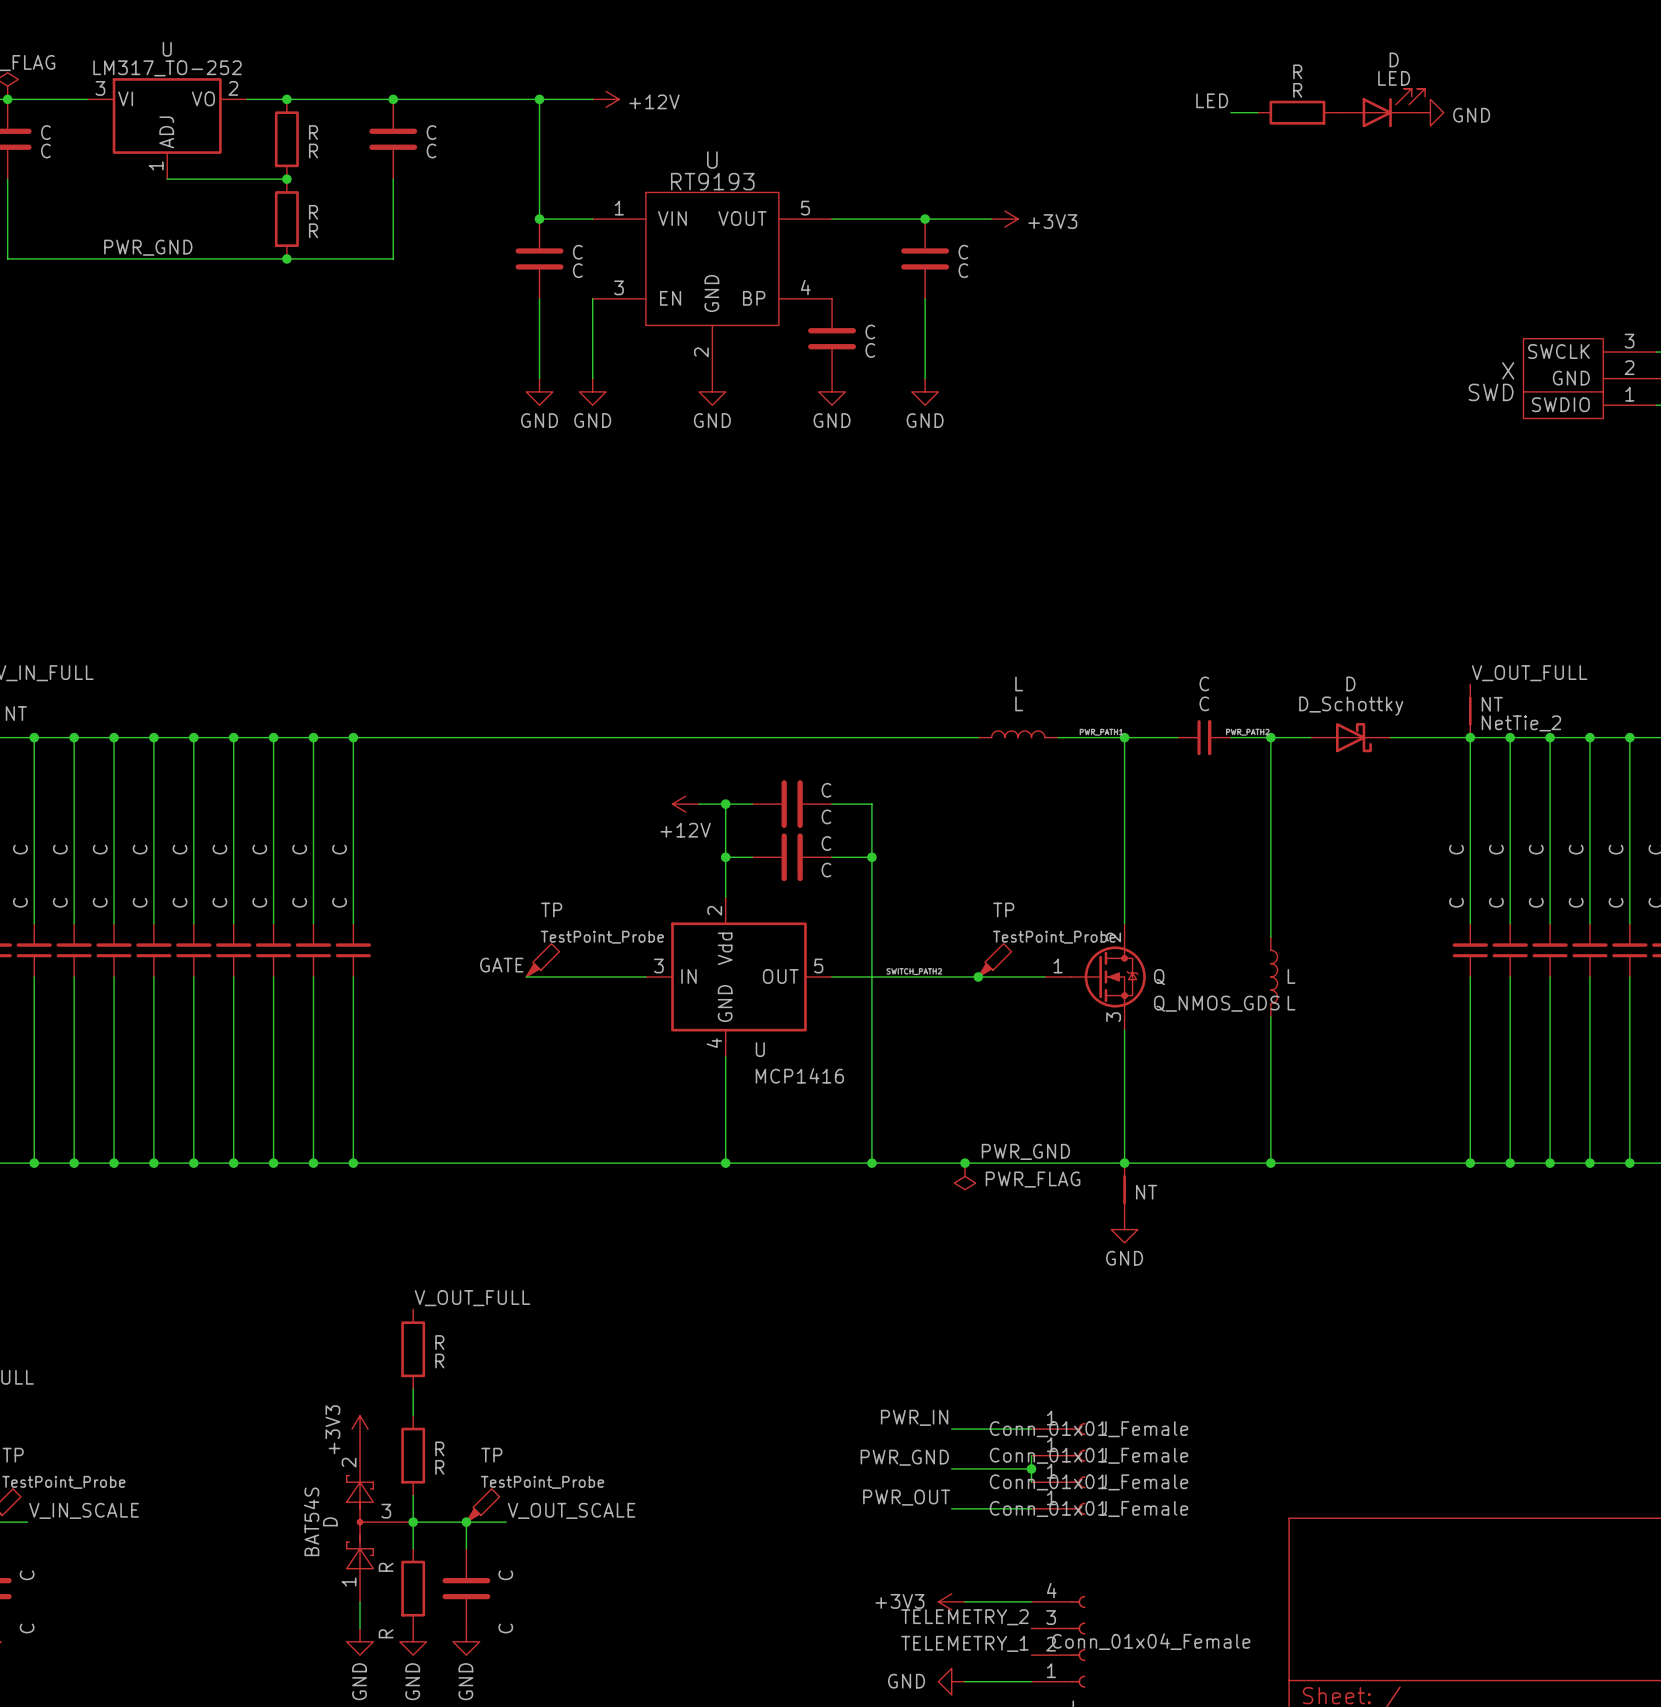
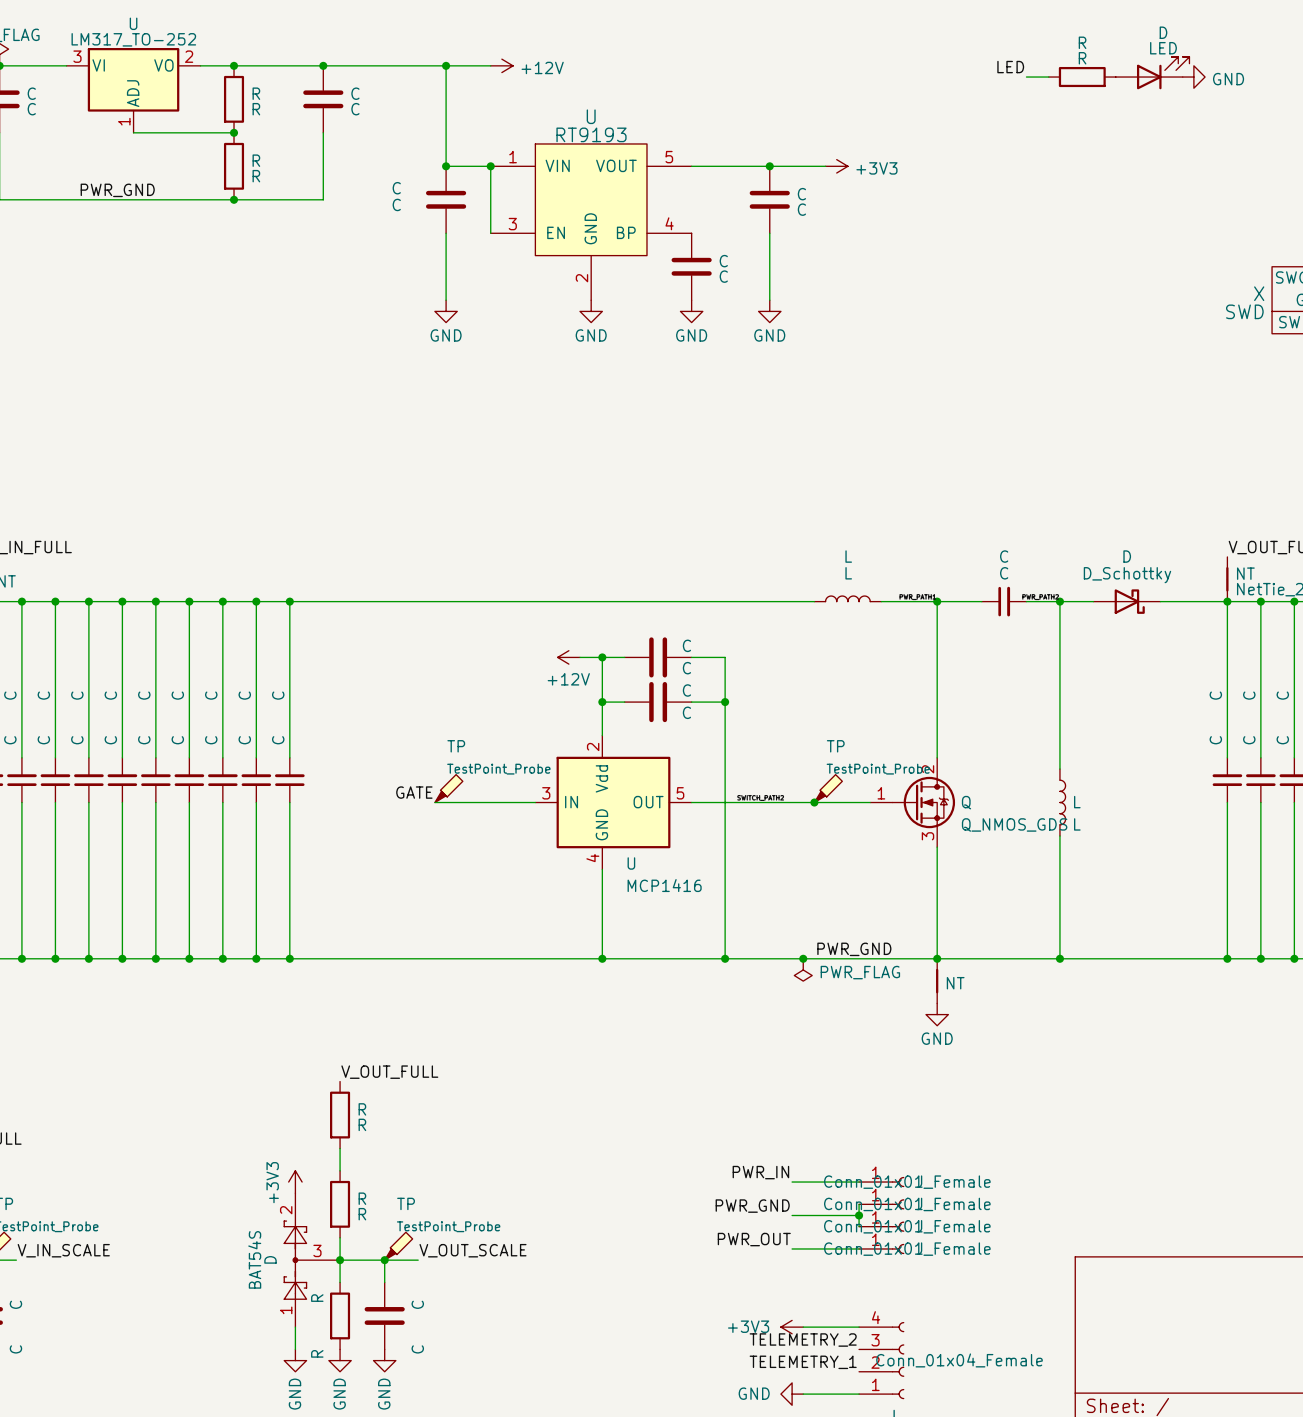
junction: none -> (490, 166)
C name position: C (577, 252) -> C (396, 188)
C value position: C (577, 270) -> C (396, 204)
wire: (592, 298) (592, 378) -> (490, 233) (490, 166)
power symbol: GND (592, 391) -> none

